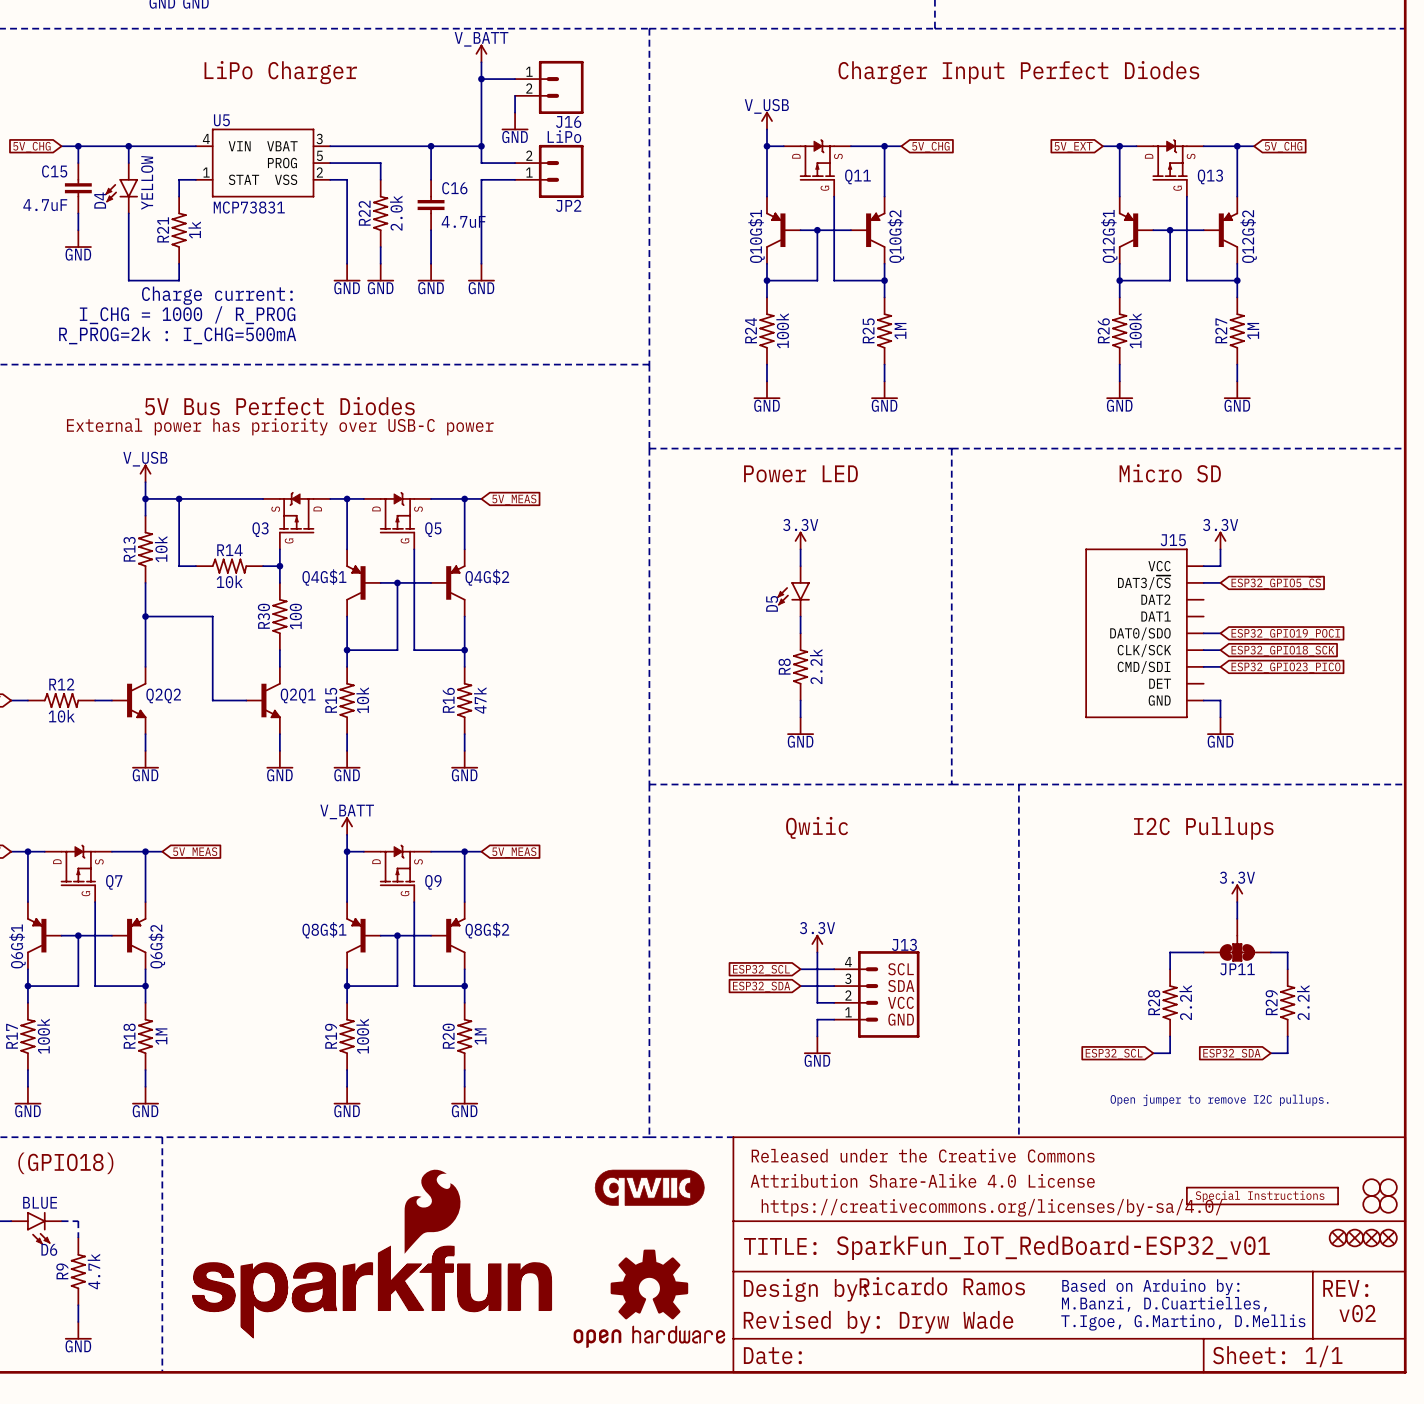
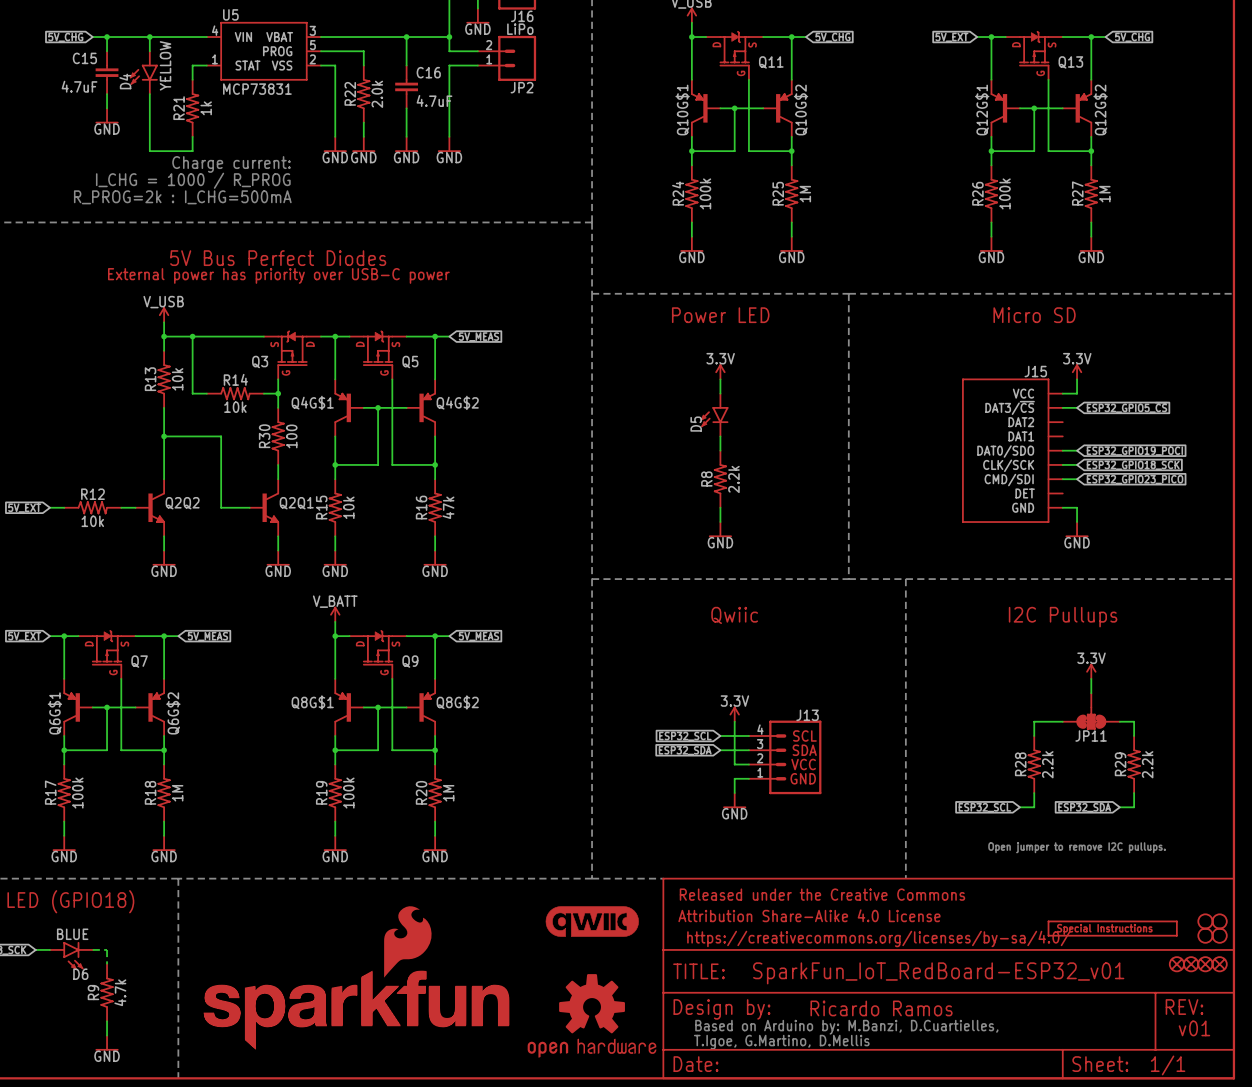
text position: Ricardo Ramos (942, 1286) -> Ricardo Ramos (881, 1008)
text: Based on Arduino by: (1150, 1287) -> none
text: M.Banzi, D.Cuartielles, (1164, 1304) -> none
text: none -> Based on Arduino by: M.Banzi, D.Cuartielles, (846, 1027)
text: v02 (1357, 1313) -> v01 (1194, 1028)
text: Revised by: Dryw Wade (878, 1322) -> none
text: T.Igoe, G.Martino, D.Mellis (1183, 1322) -> none
text: none -> T.Igoe, G.Martino, D.Mellis (781, 1042)

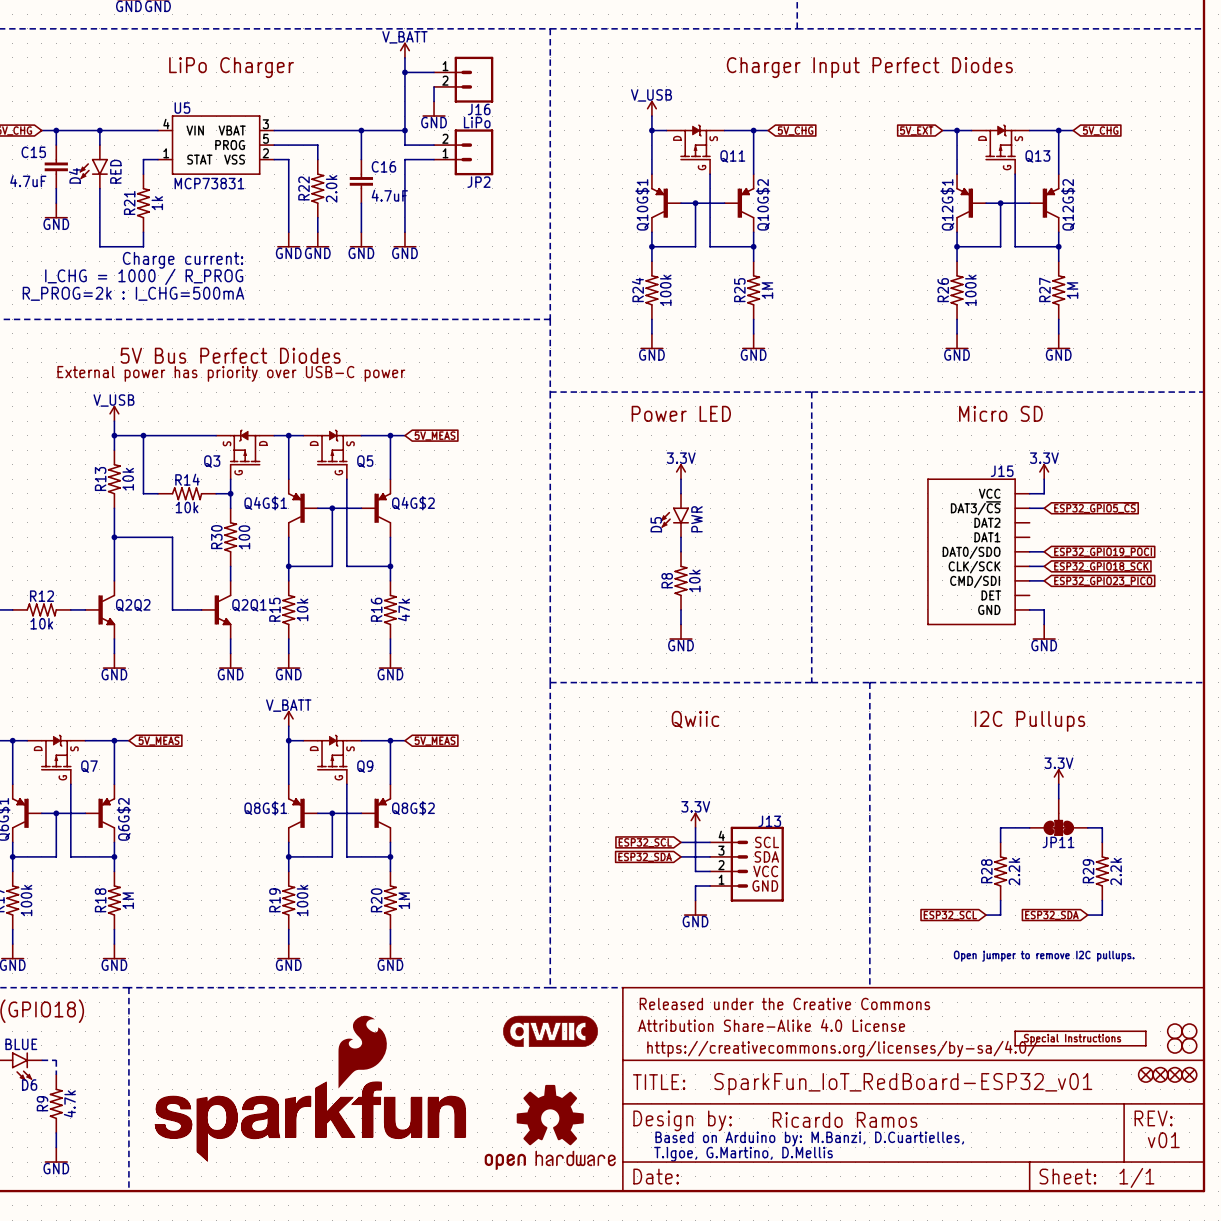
D4 value: YELLOW (165, 65) -> RED (115, 171)
D5 value: none -> PWR (696, 519)
R8 value: 2.2k (733, 479) -> 10k (694, 580)

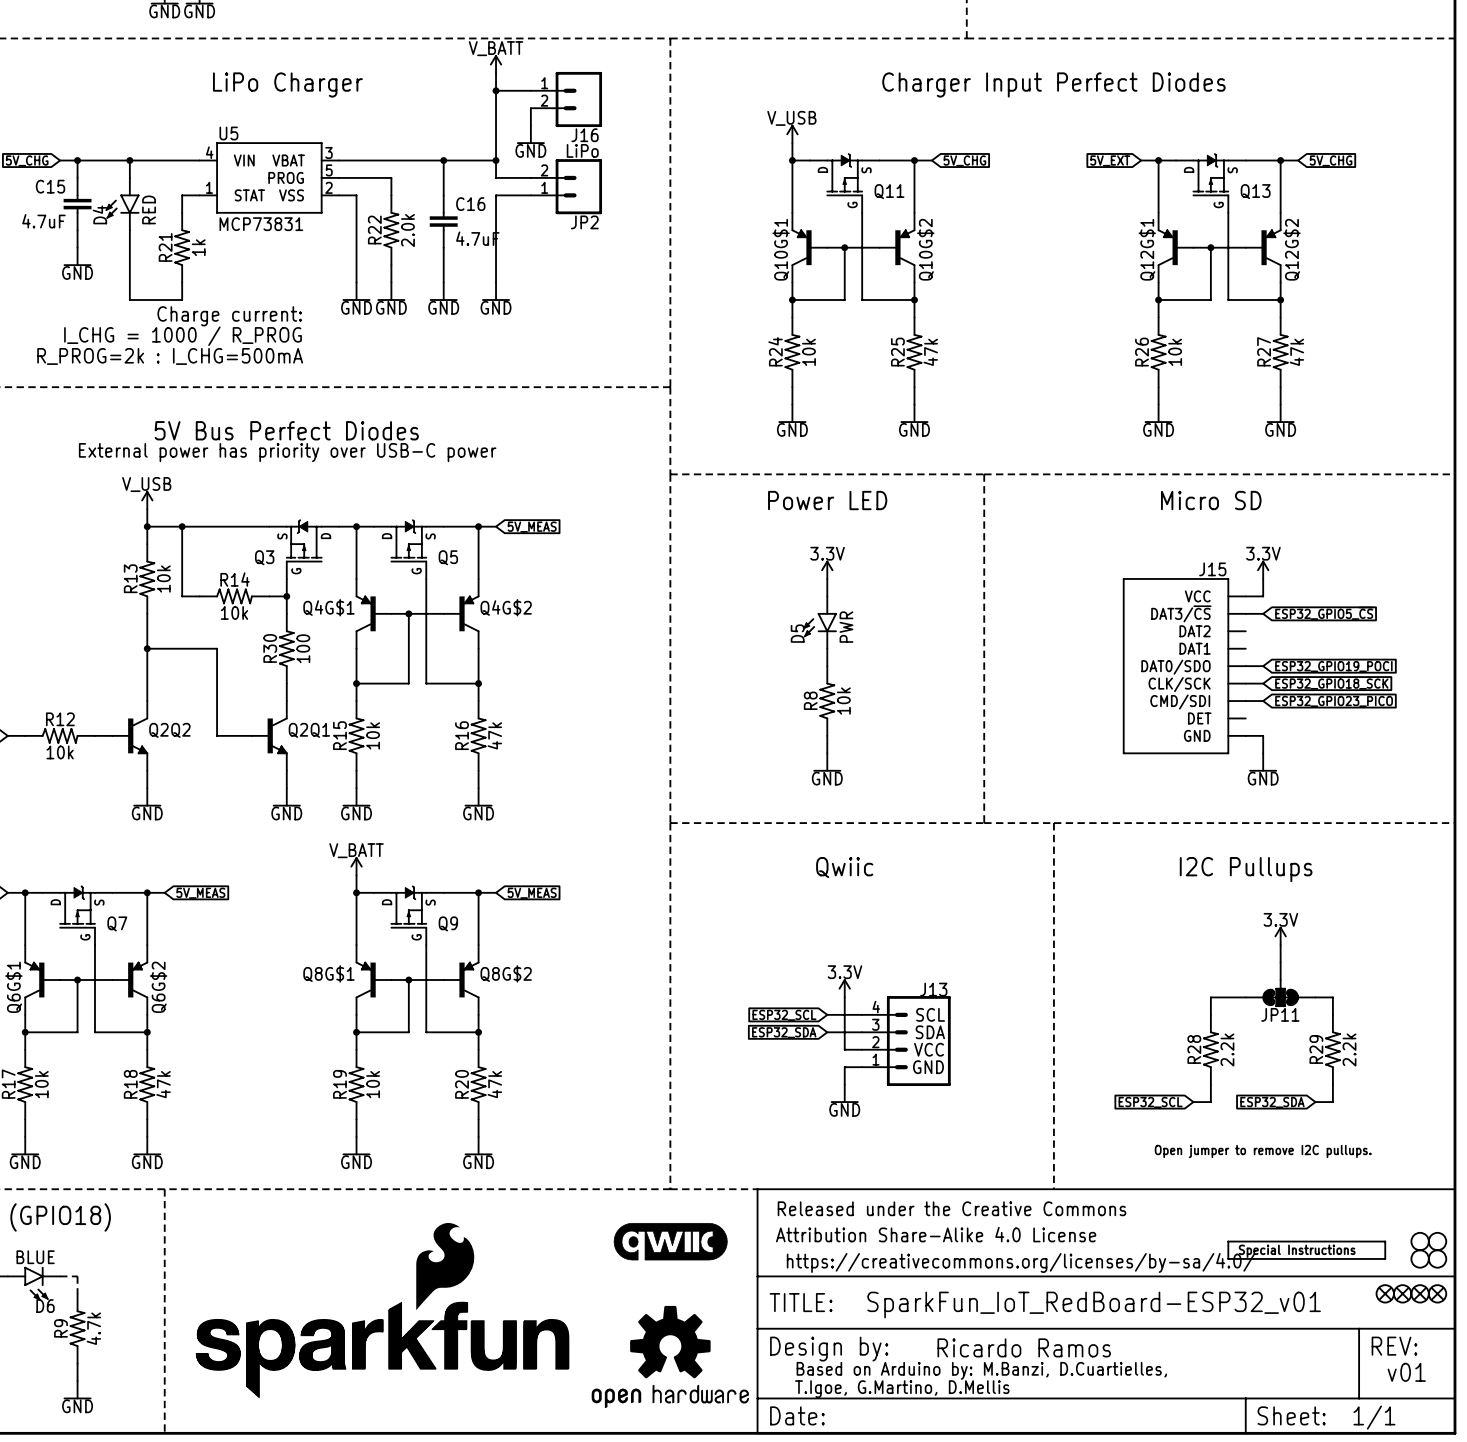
R24 value: 100k (665, 290) -> 10k (808, 352)
R25 value: 1M (767, 290) -> 47k (930, 352)
R26 value: 100k (970, 290) -> 10k (1175, 352)
R27 value: 1M (1072, 290) -> 47k (1296, 352)
R17 value: 100k (26, 900) -> 10k (41, 1084)
R18 value: 1M (128, 900) -> 47k (163, 1084)
R19 value: 100k (302, 900) -> 10k (373, 1084)
R20 value: 1M (404, 900) -> 47k (494, 1084)

